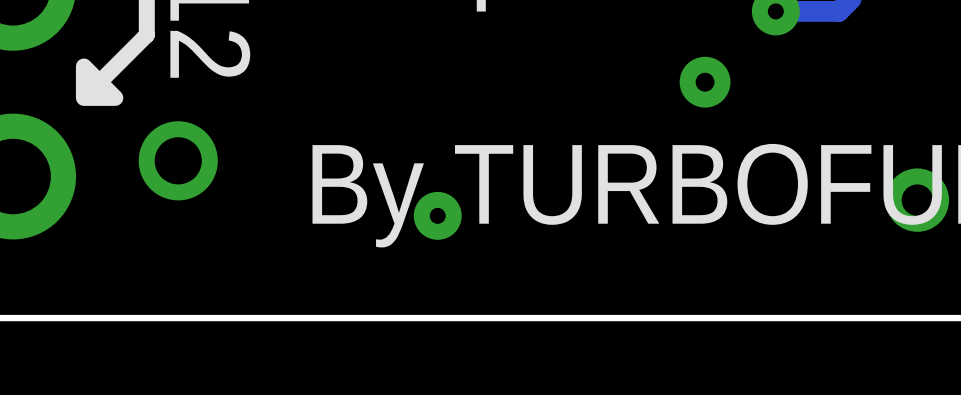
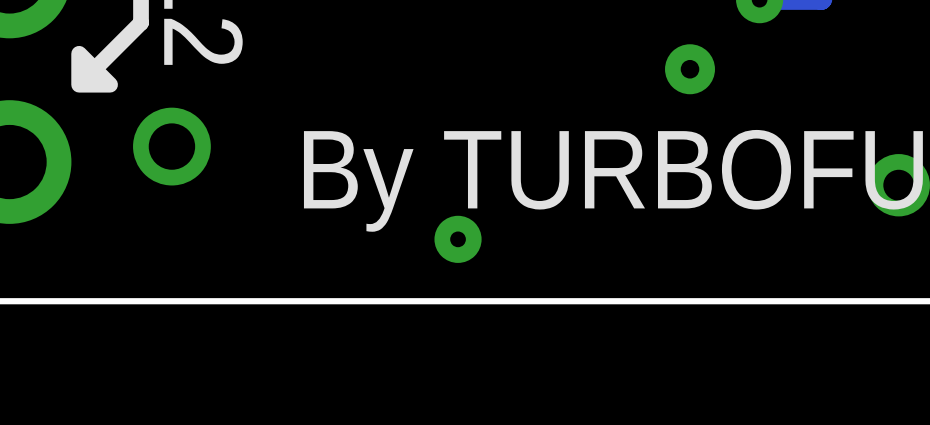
via position: (437, 215) -> (458, 239)

